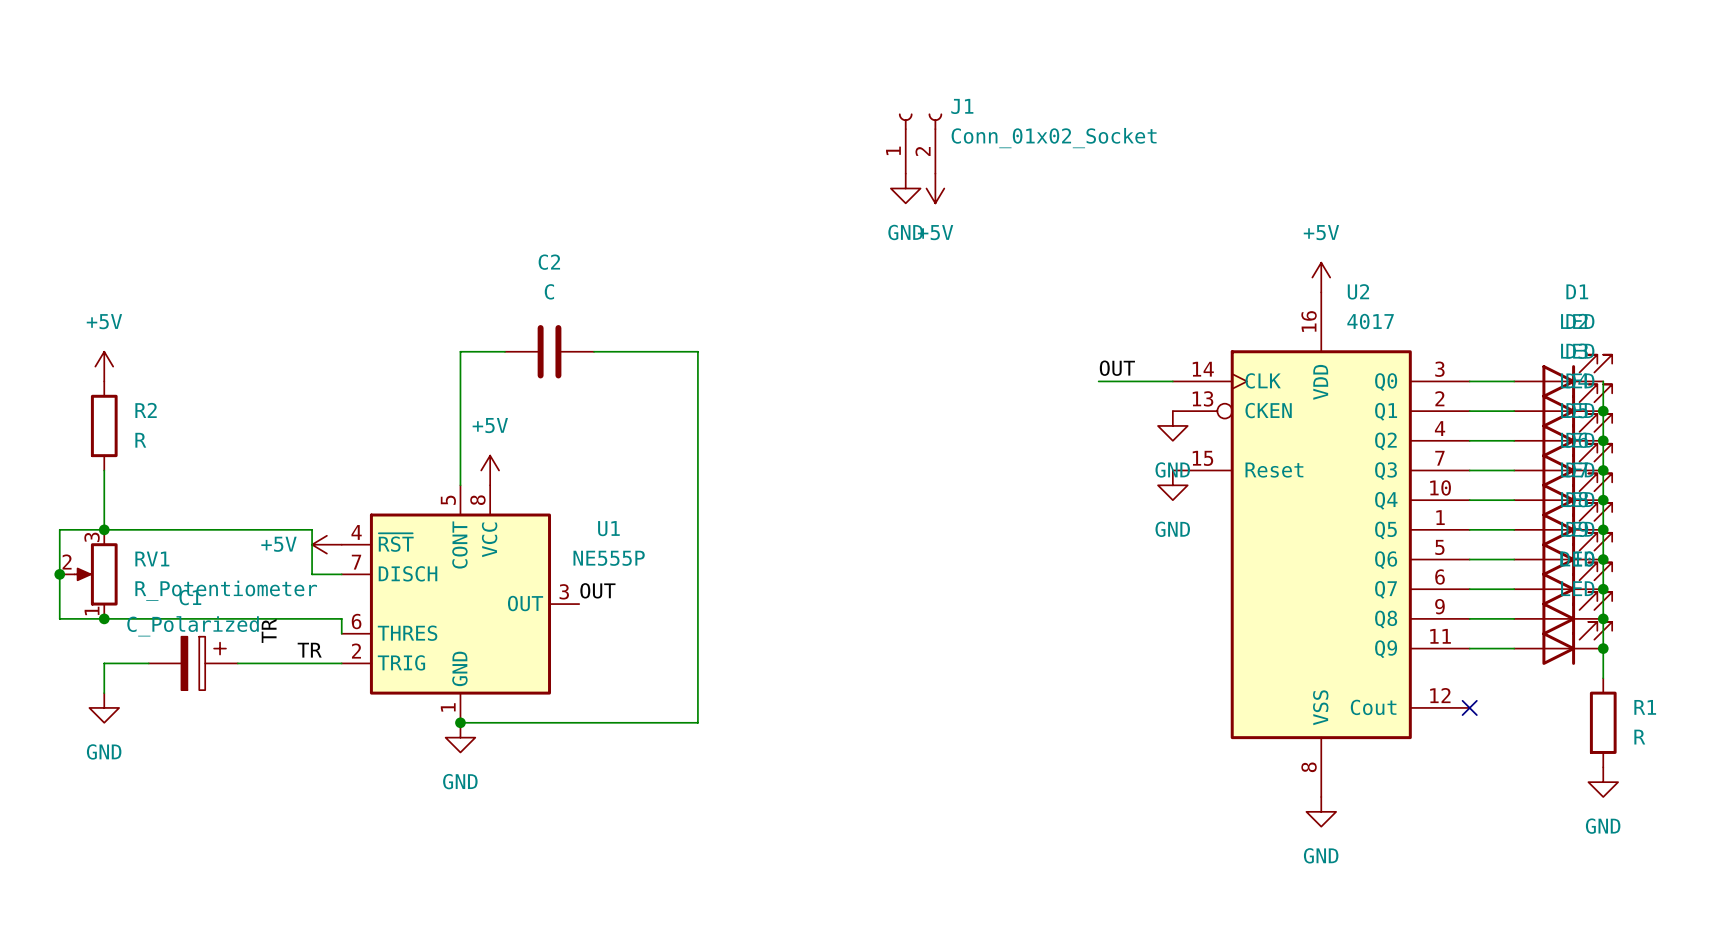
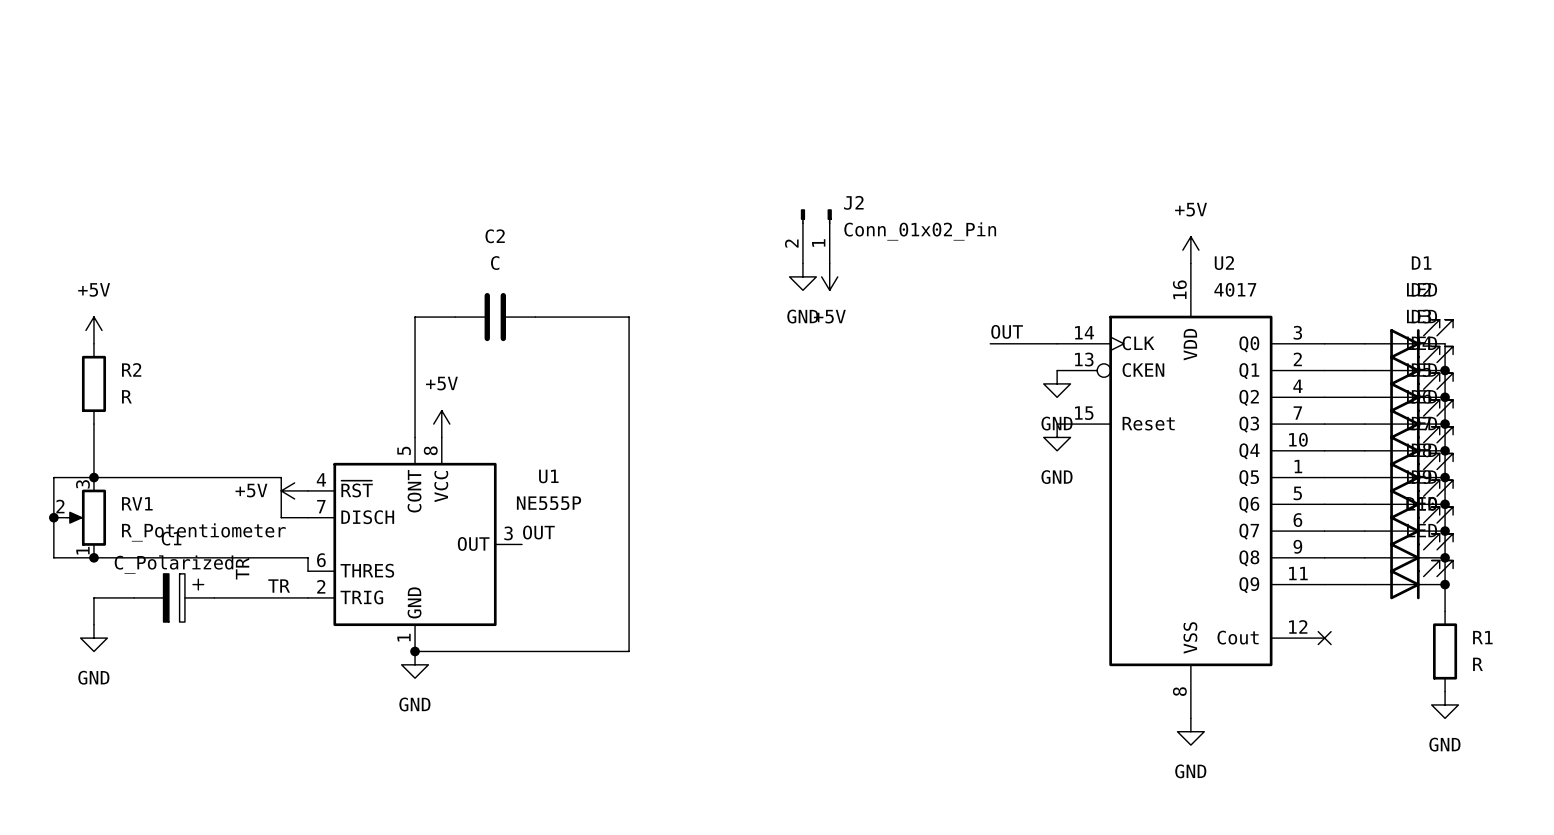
J1: Conn_01x02_Socket (920, 143) -> none
power symbol position: GND (905, 188) -> GND (802, 276)
power symbol position: +5V (935, 188) -> +5V (829, 276)
J2: none -> Conn_01x02_Pin (816, 236)

